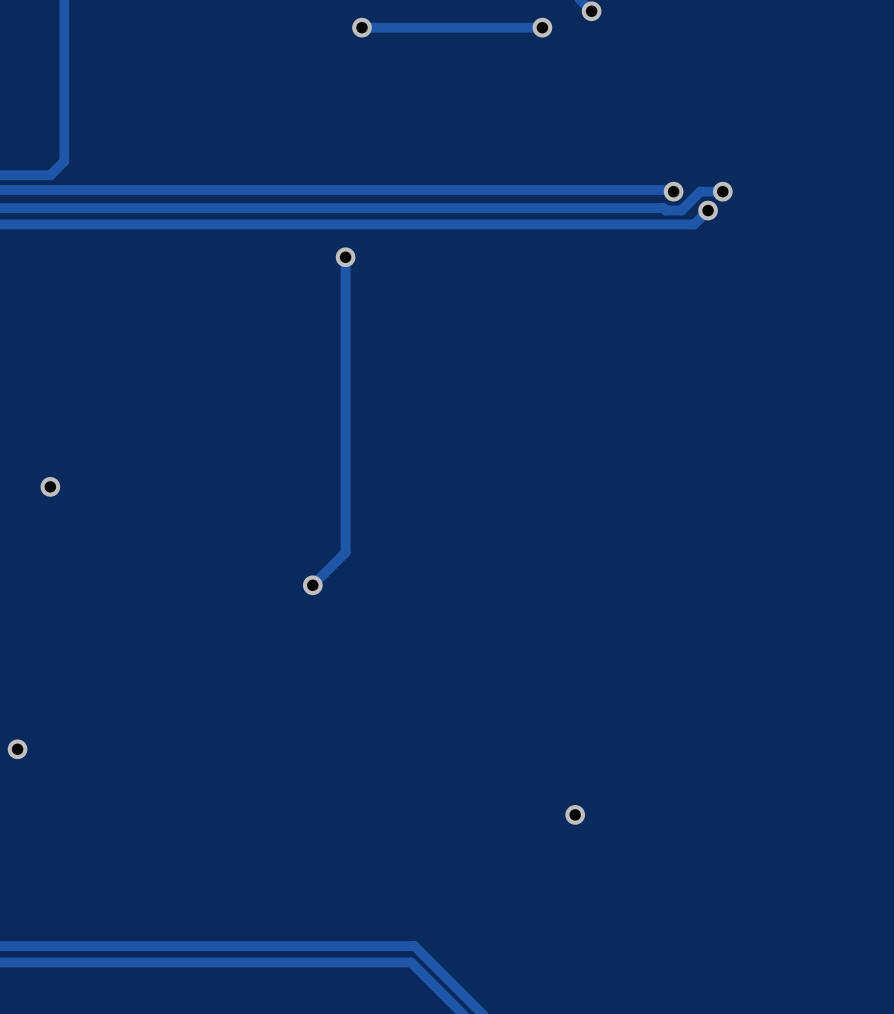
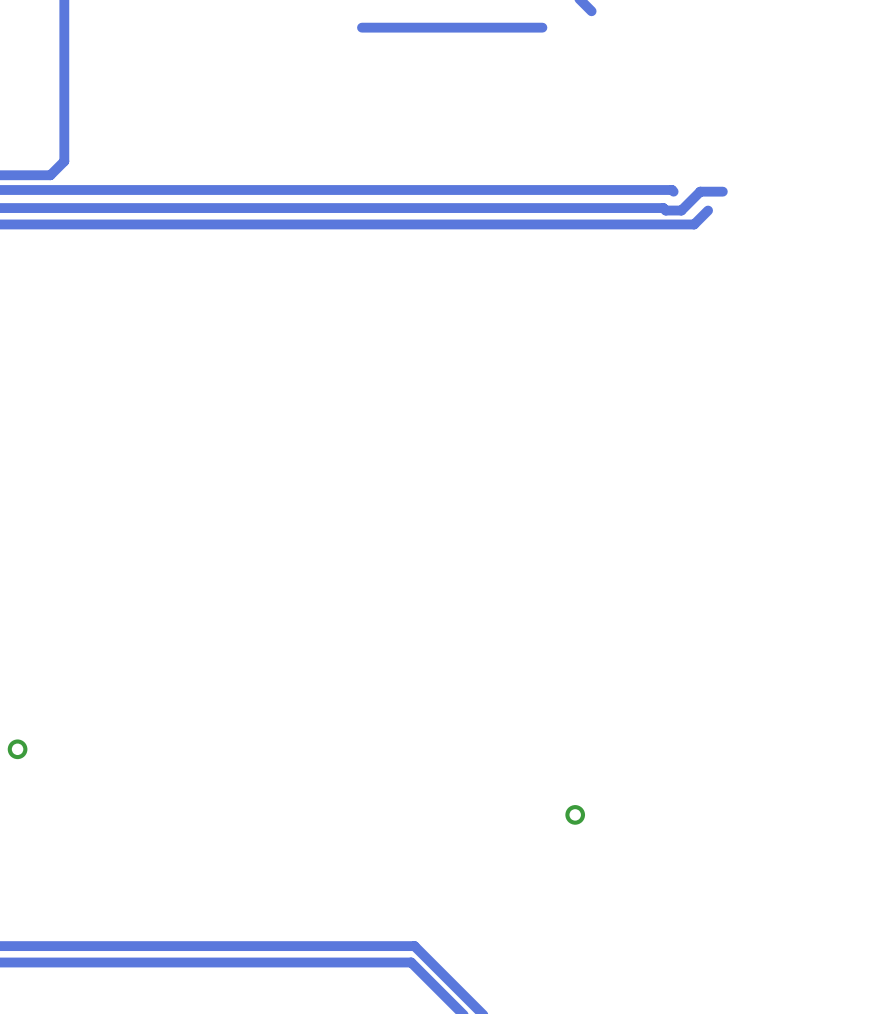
via: (591, 11) -> none
via: (361, 27) -> none
via: (542, 27) -> none
via: (673, 191) -> none
via: (722, 191) -> none
via: (708, 210) -> none
track: (345, 257) (345, 552) (312, 585) -> none
via: (345, 257) -> none
via: (50, 486) -> none
via: (312, 585) -> none

